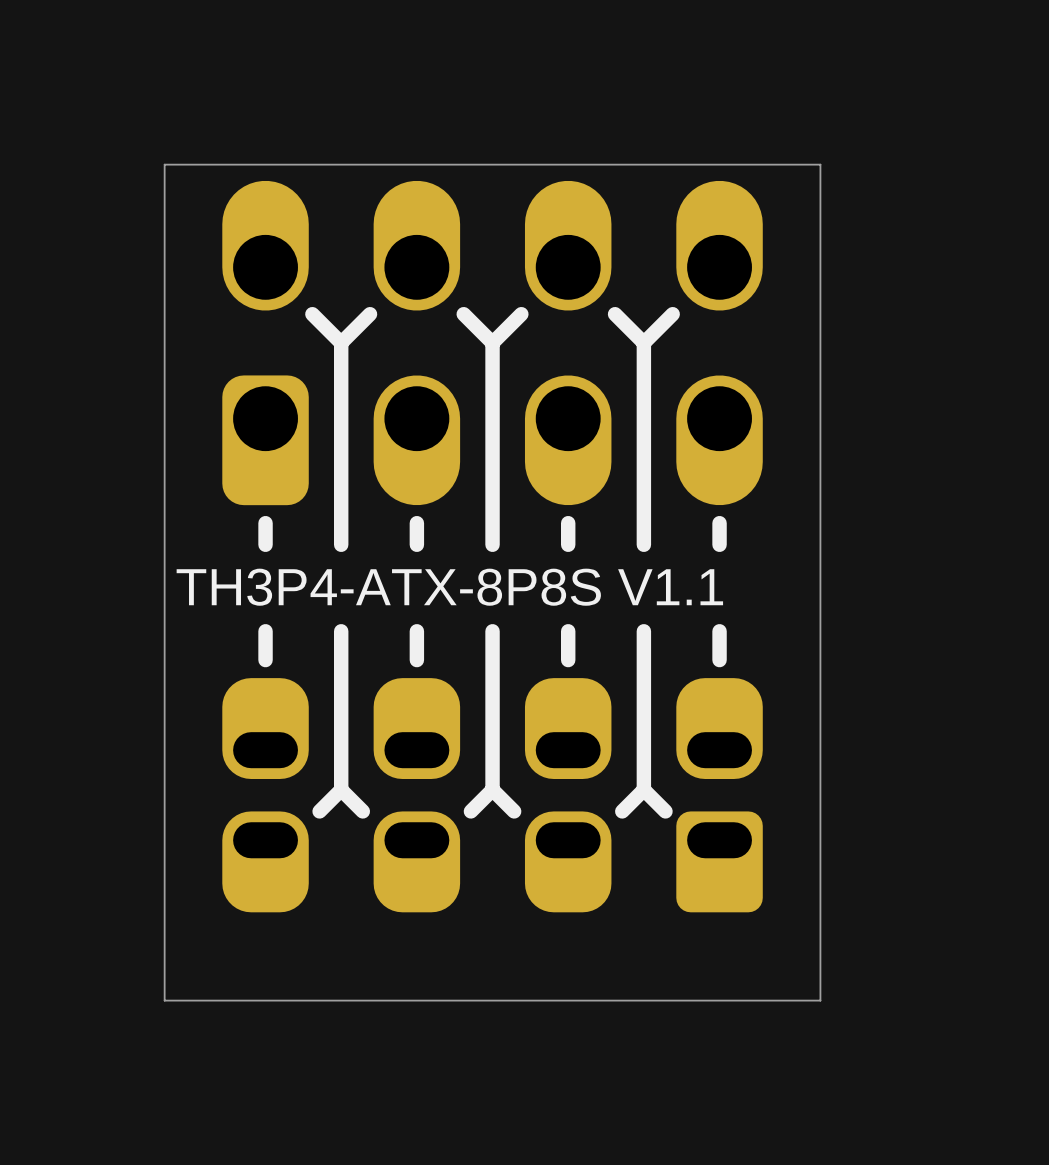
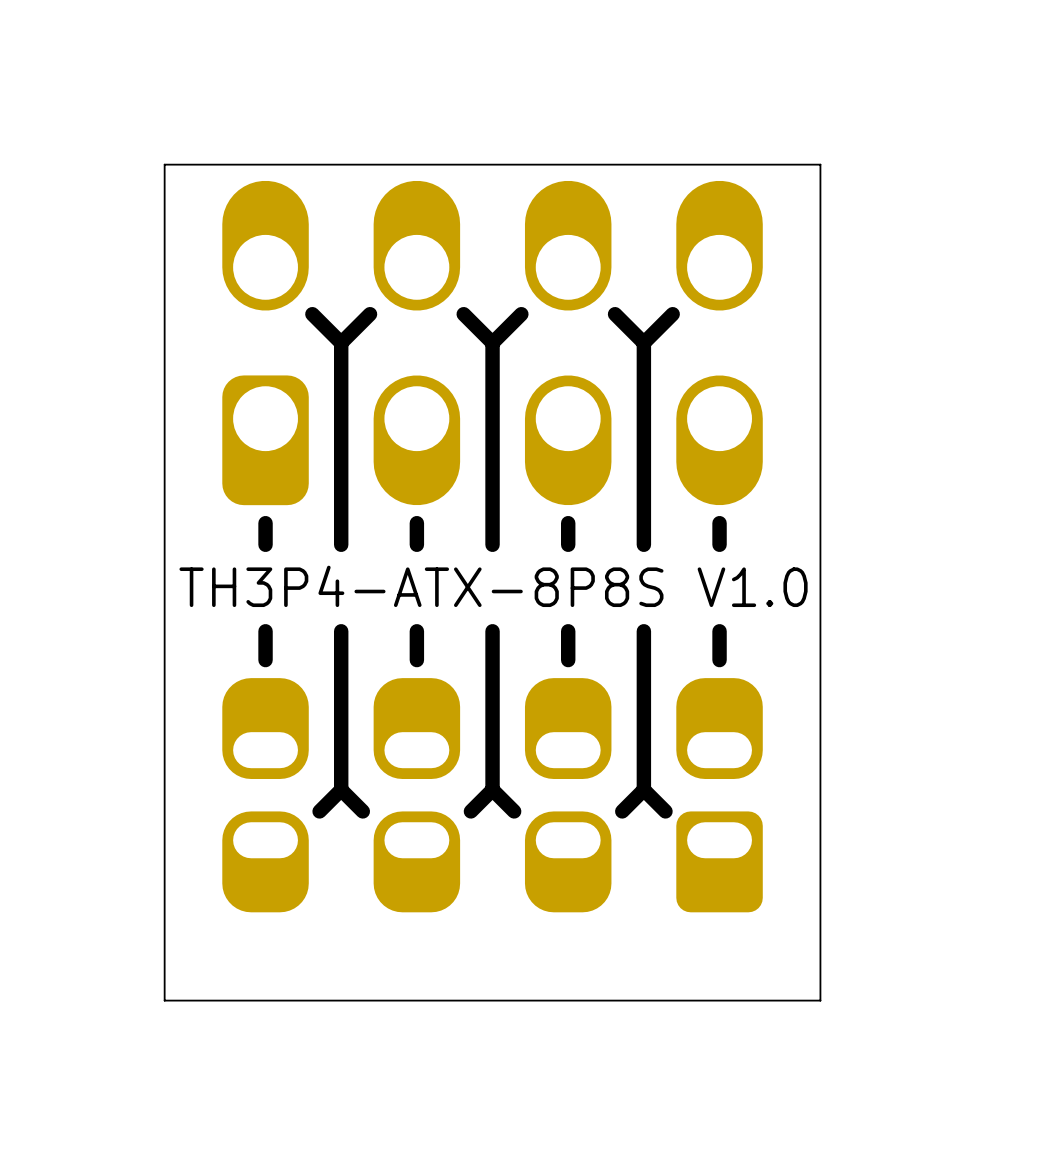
text: TH3P4-ATX-8P8S V1.1 (449, 587) -> TH3P4-ATX-8P8S V1.0 (493, 586)

